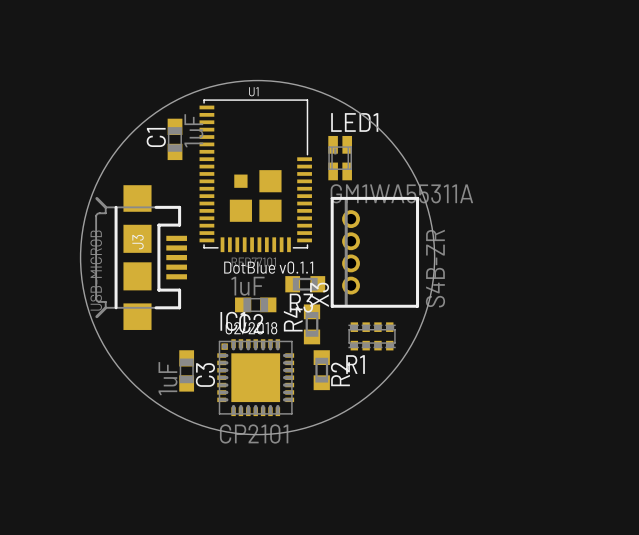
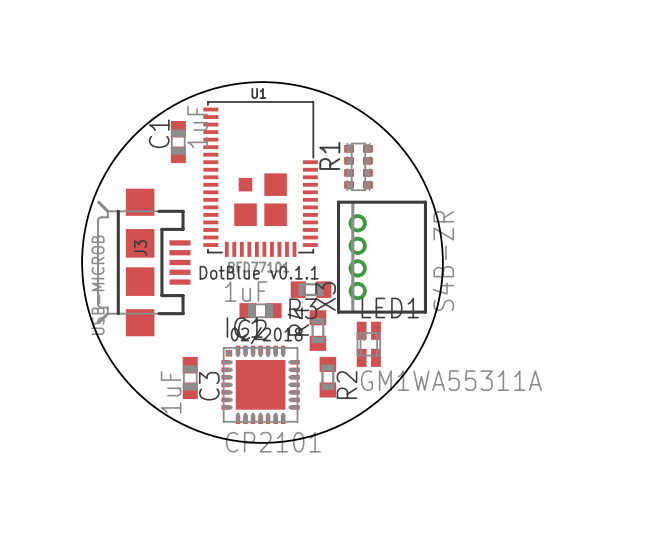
LED1 position: (340, 158) -> (368, 344)
R1 rotation: 0° (372, 336) -> 90° clockwise (358, 166)
R1 position: (372, 336) -> (358, 166)

